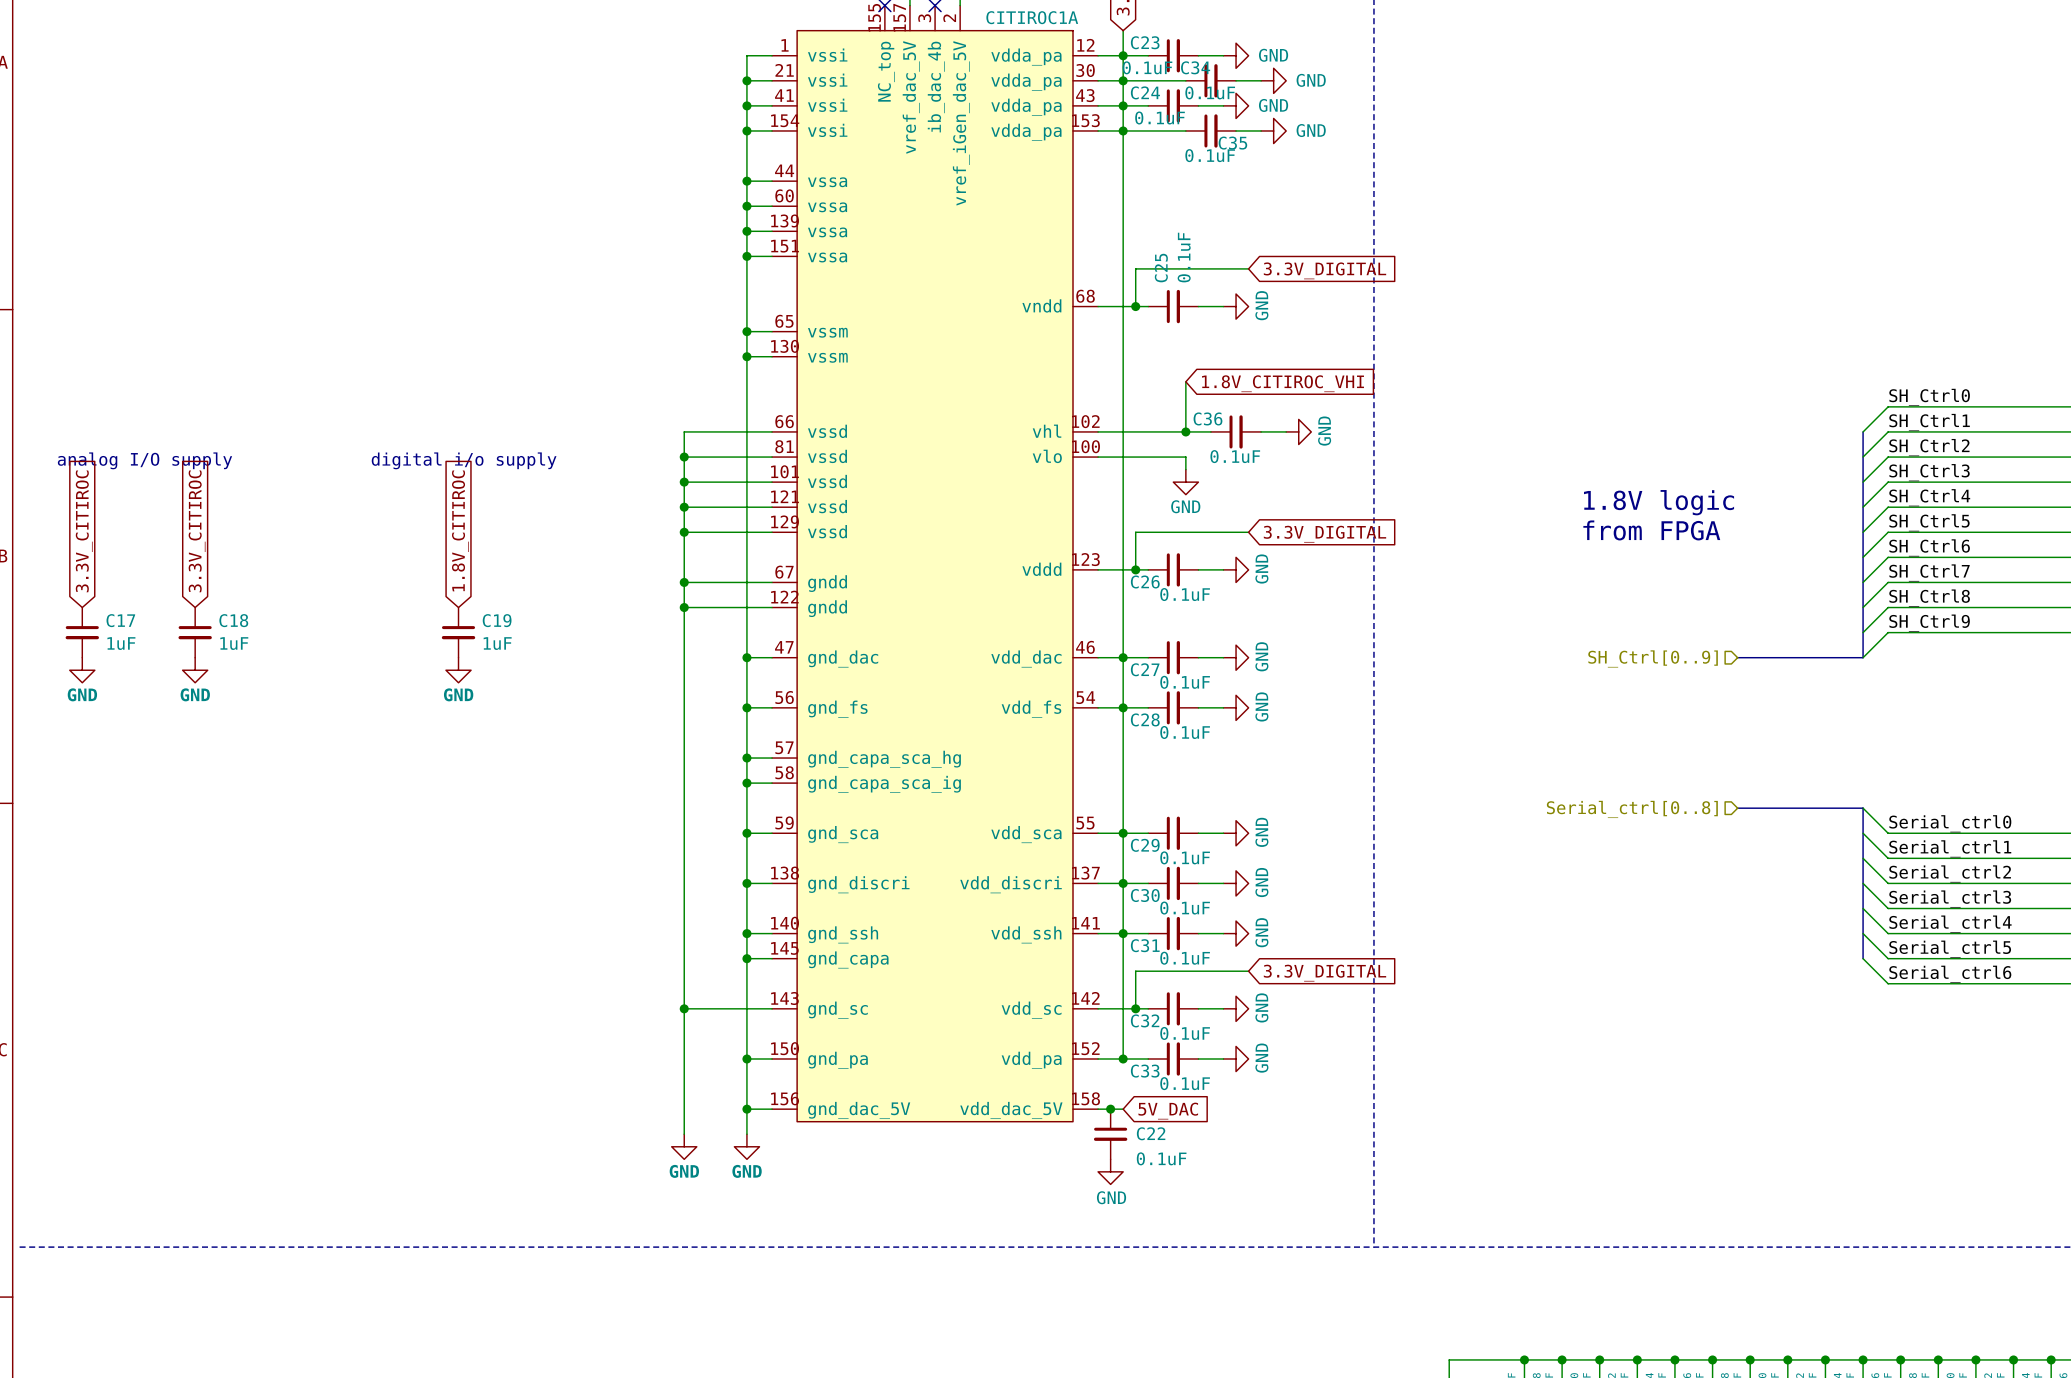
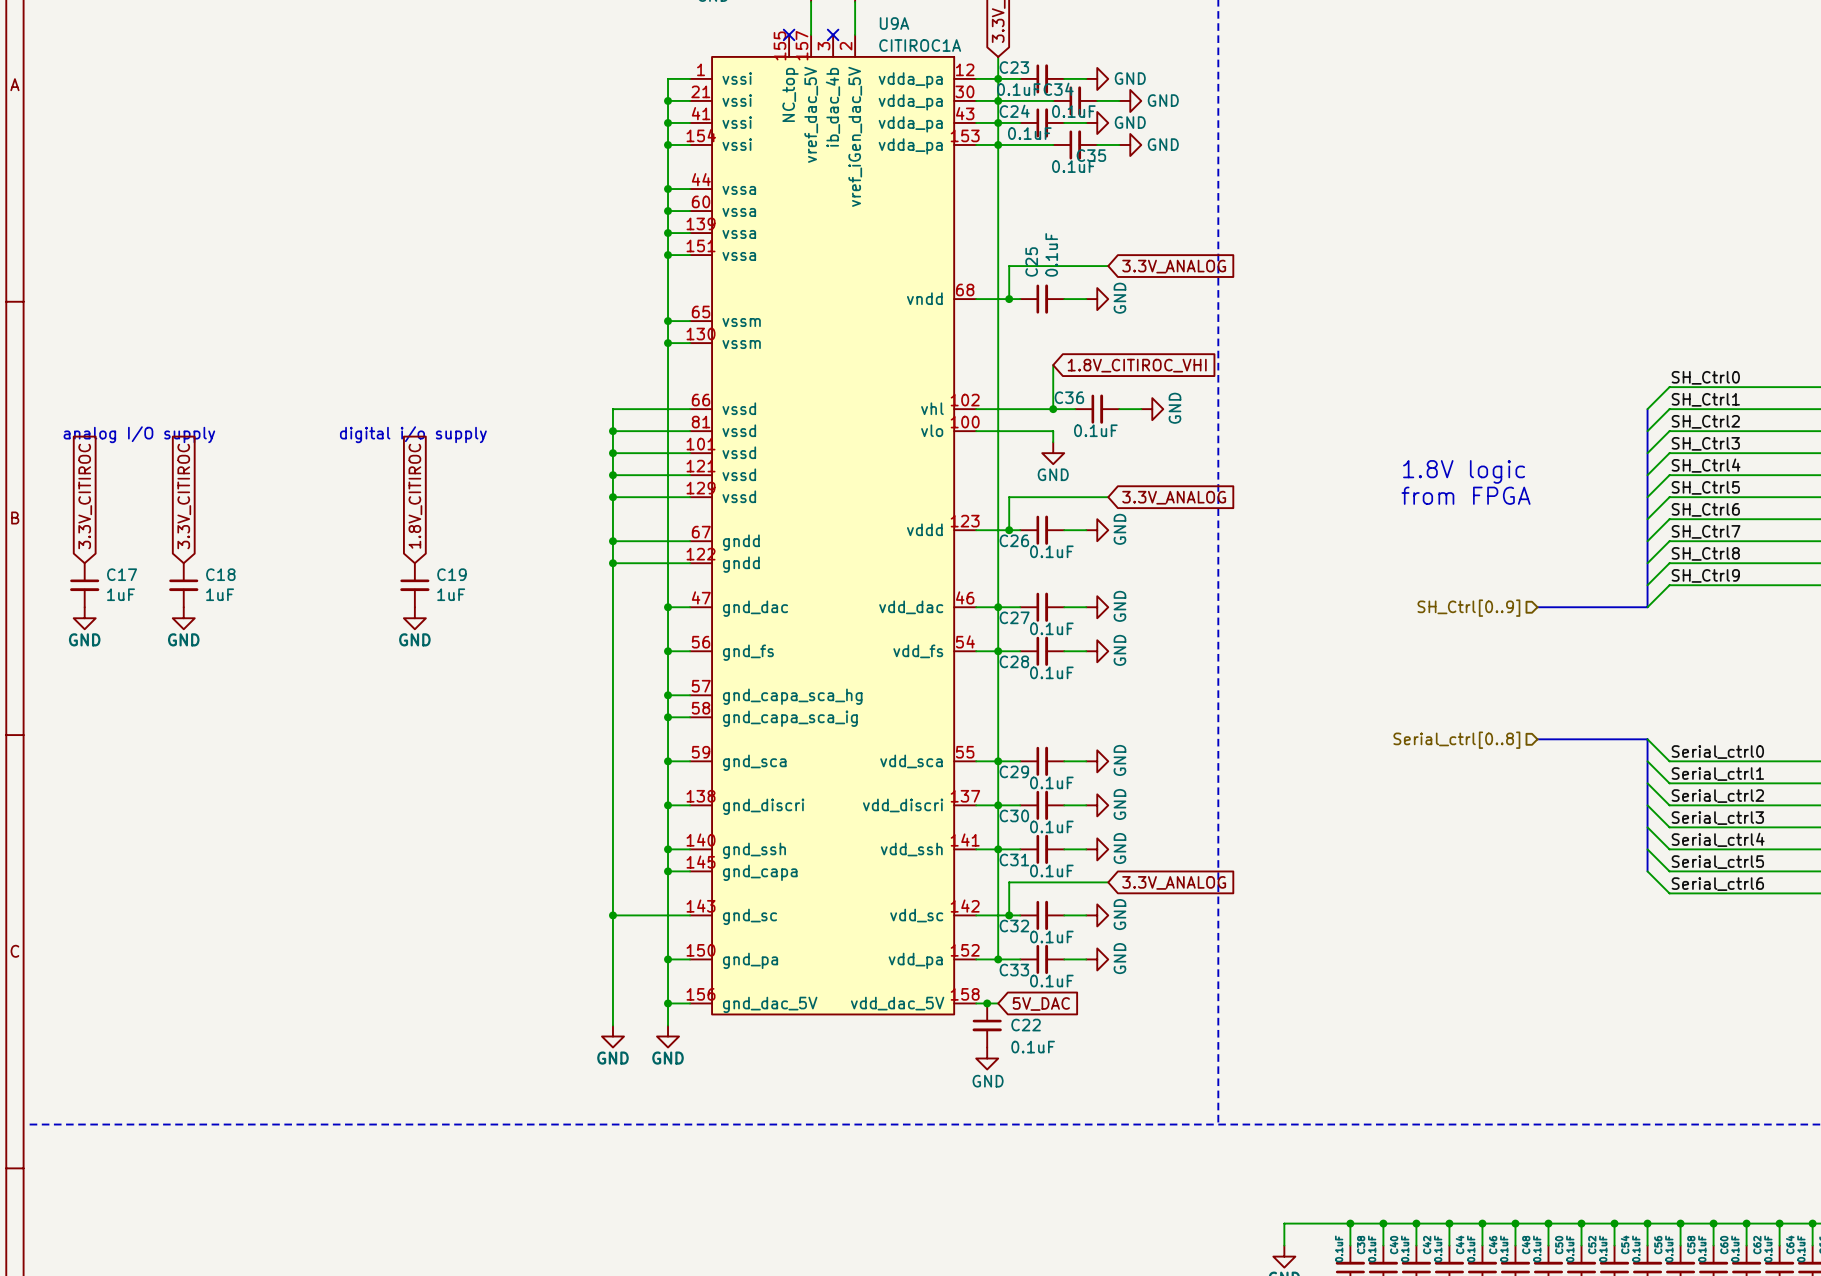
global label: 3.3V_DIGITAL (1324, 270) -> 3.3V_ANALOG (1174, 266)
global label: 3.3V_DIGITAL (1324, 534) -> 3.3V_ANALOG (1174, 497)
global label: 3.3V_DIGITAL (1324, 973) -> 3.3V_ANALOG (1174, 882)

